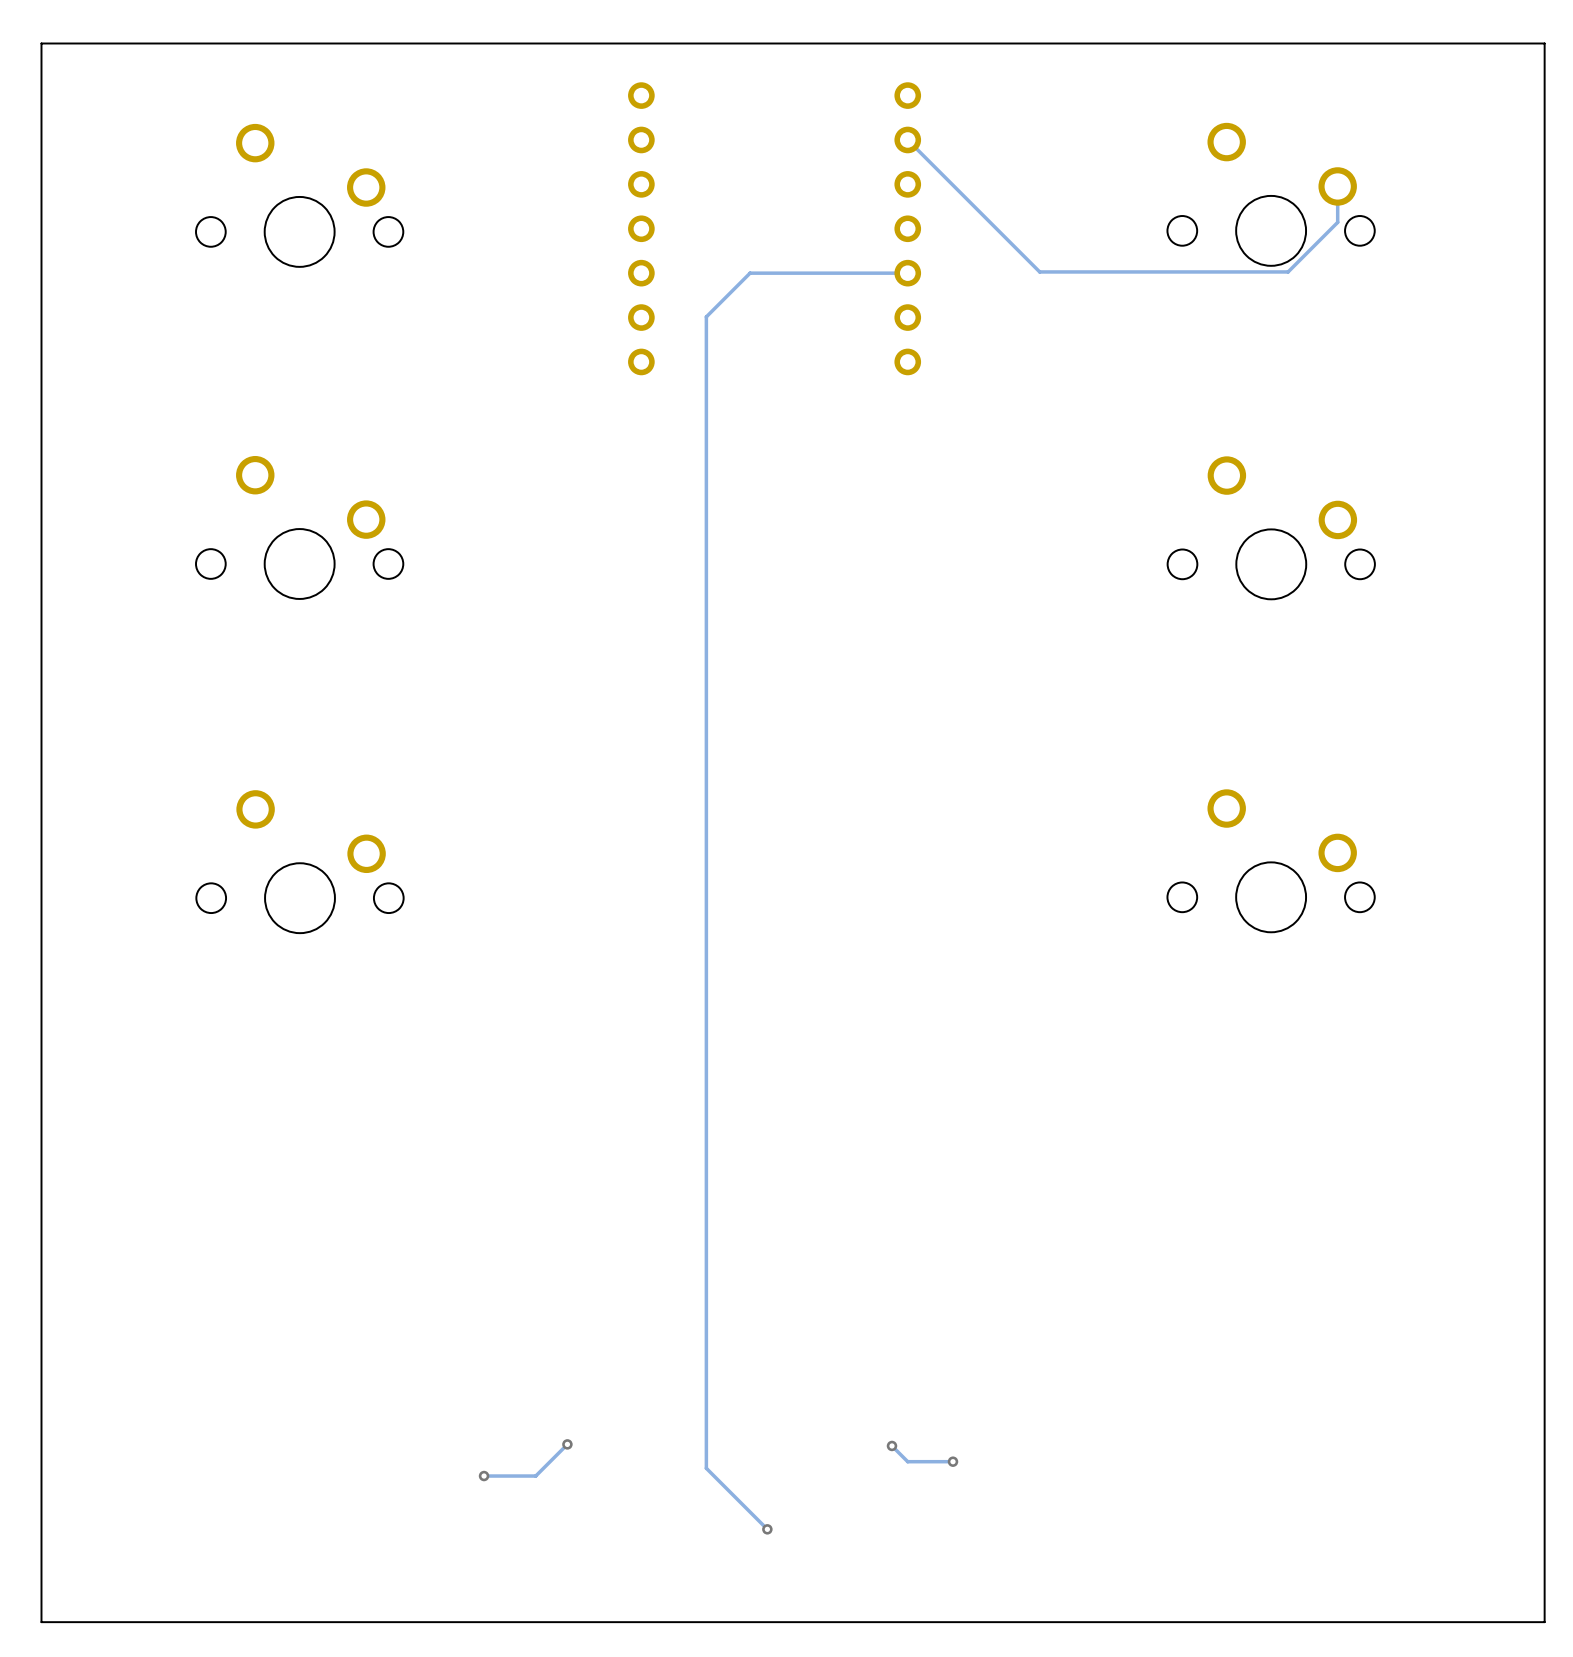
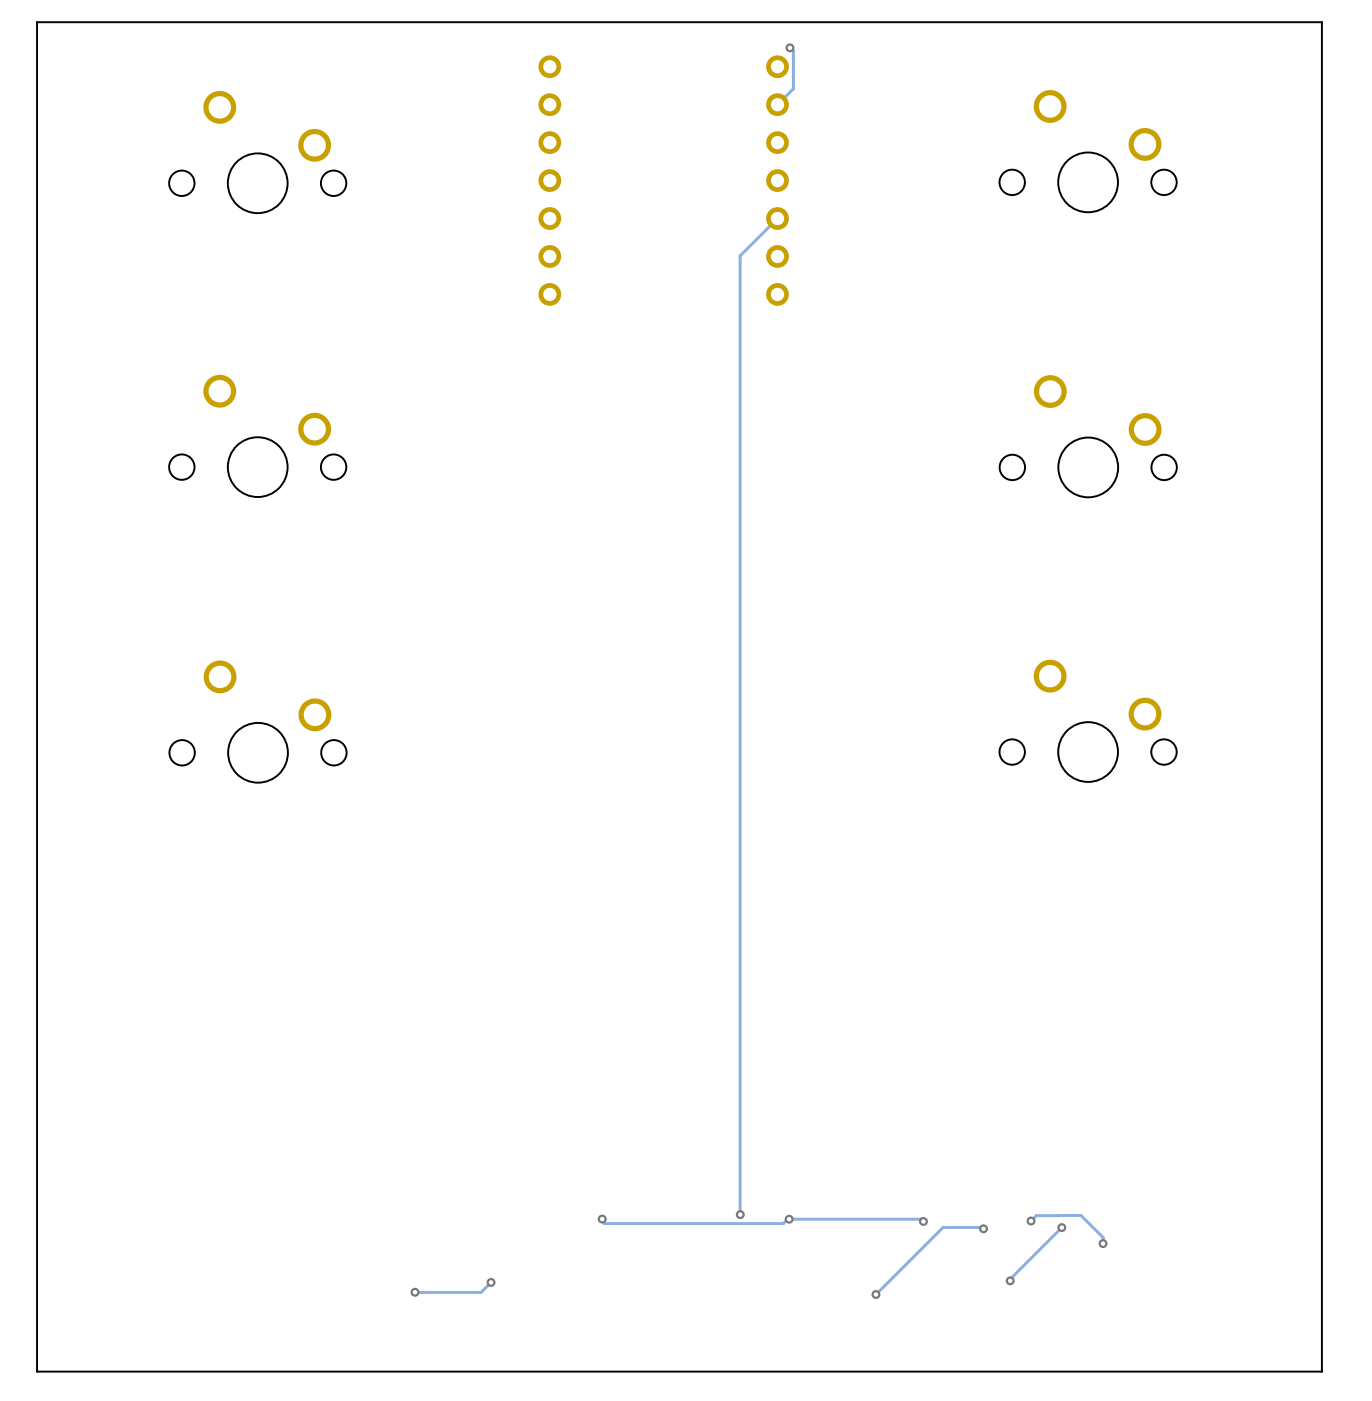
via: none -> (789, 47)
track: (907, 139) (1039, 271) (1288, 271) (1337, 222) (1337, 186) -> (777, 104) (793, 88) (793, 51) (789, 47)
track: (907, 273) (750, 273) (706, 316) (706, 1468) (767, 1529) -> (777, 218) (740, 255) (740, 1217)
via: none -> (740, 1214)
track: none -> (1060, 1215) (1081, 1215) (1103, 1237) (1103, 1243)
track: none -> (1060, 1215) (1036, 1215) (1031, 1221)
track: none -> (600, 1219) (604, 1223) (783, 1223) (787, 1219) (921, 1219) (923, 1221)
via: none -> (602, 1219)
via: none -> (789, 1219)
track: (567, 1444) (535, 1476) (484, 1476) -> none
via: (567, 1444) -> none
track: (891, 1445) (907, 1461) (952, 1461) -> none
via: (891, 1445) -> none
via: none -> (1031, 1221)
via: none -> (923, 1221)
track: none -> (1061, 1227) (1010, 1280)
via: none -> (1061, 1227)
track: none -> (983, 1228) (943, 1227) (875, 1294)
via: none -> (983, 1228)
via: (952, 1461) -> none
via: none -> (1103, 1243)
via: (484, 1476) -> none
via: none -> (1010, 1280)
track: none -> (491, 1282) (481, 1292) (415, 1292)
via: none -> (491, 1282)
via: none -> (415, 1292)
via: (767, 1529) -> none
via: none -> (875, 1294)

